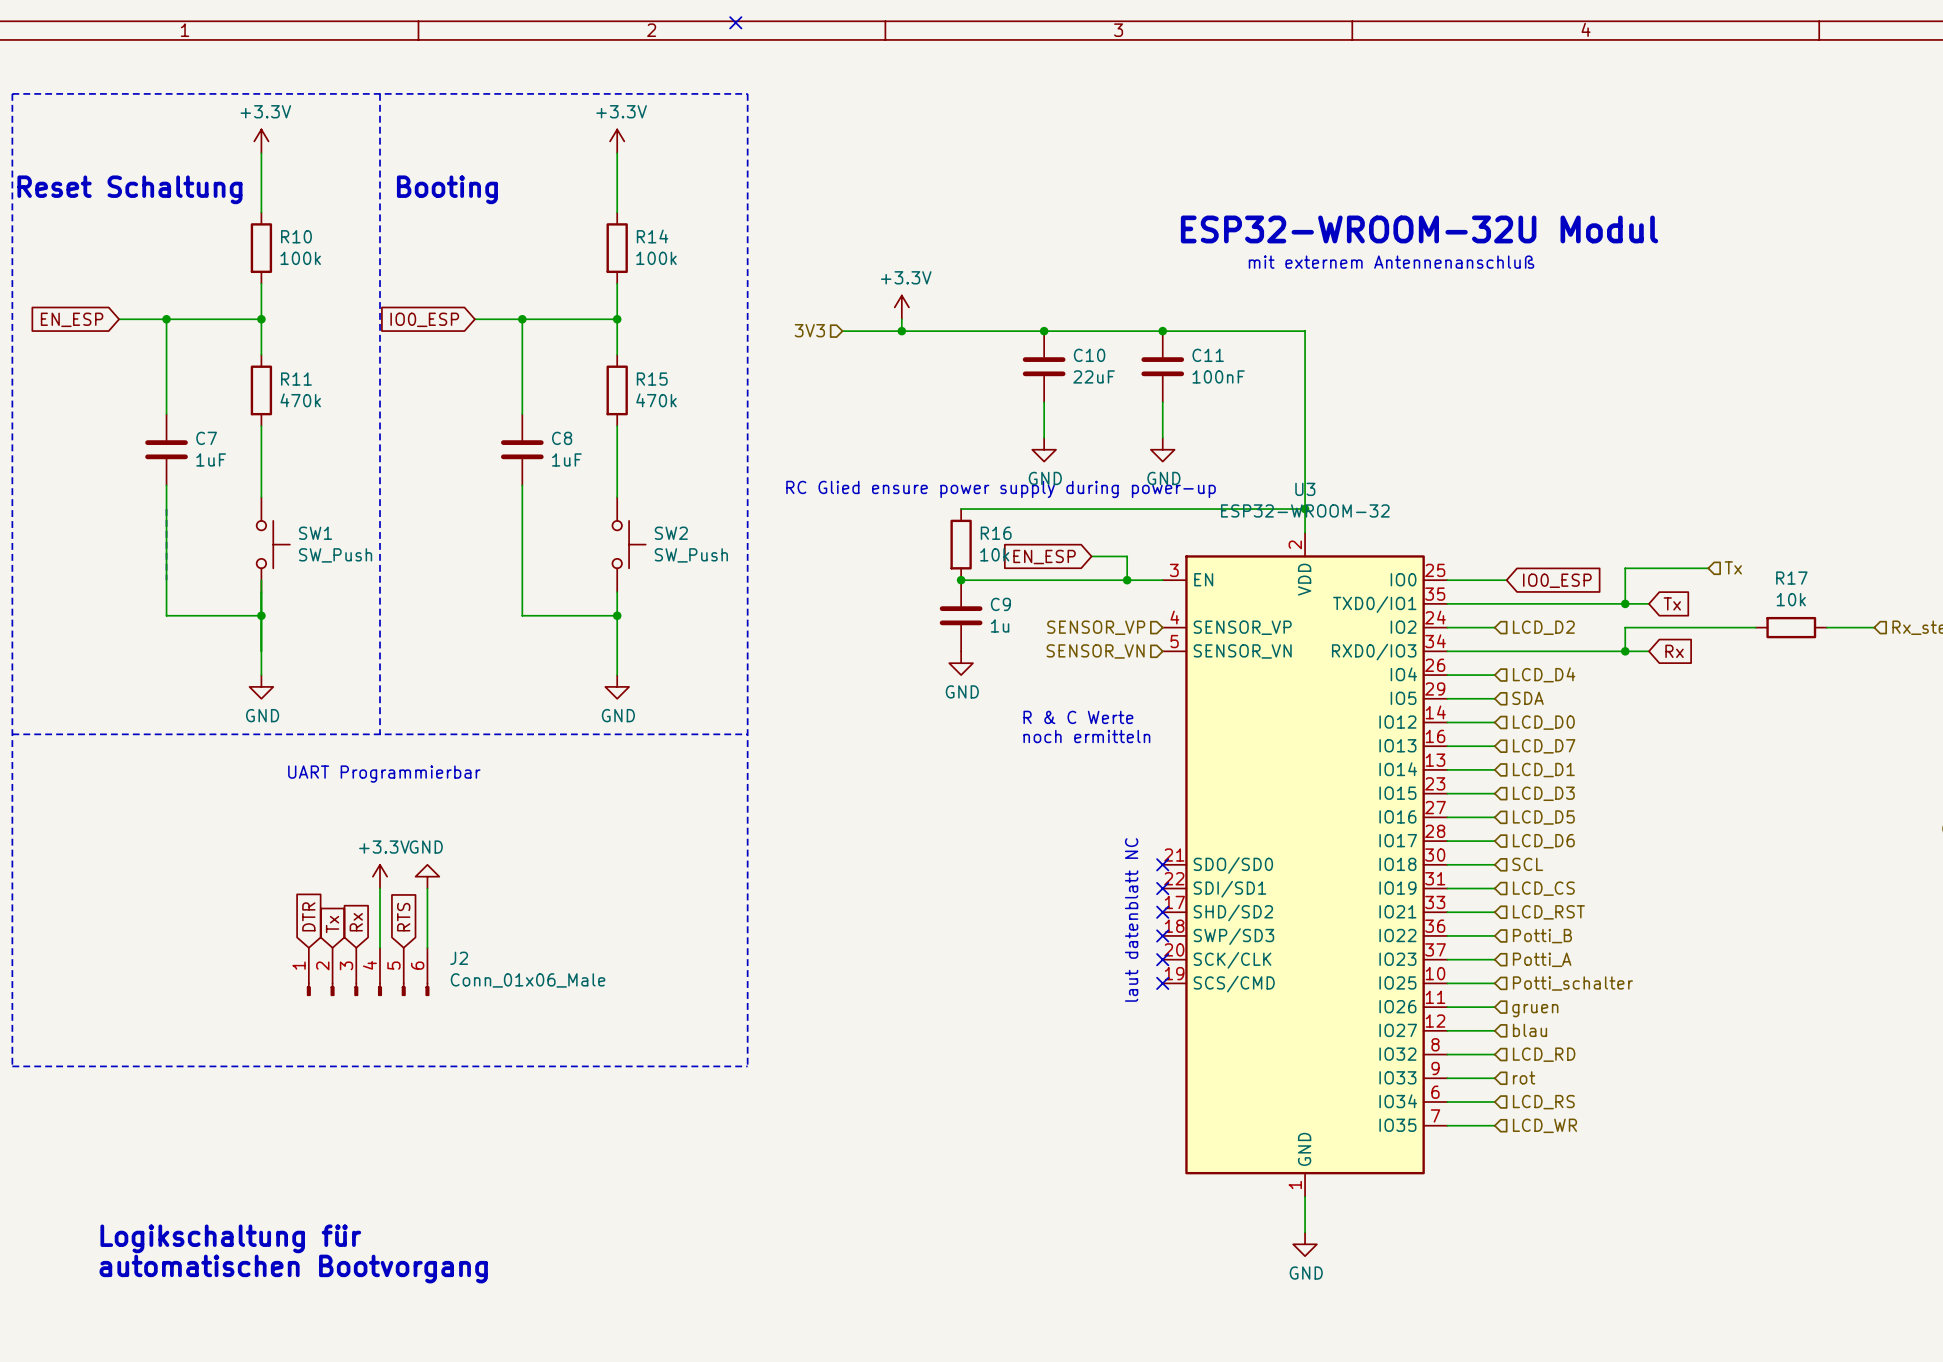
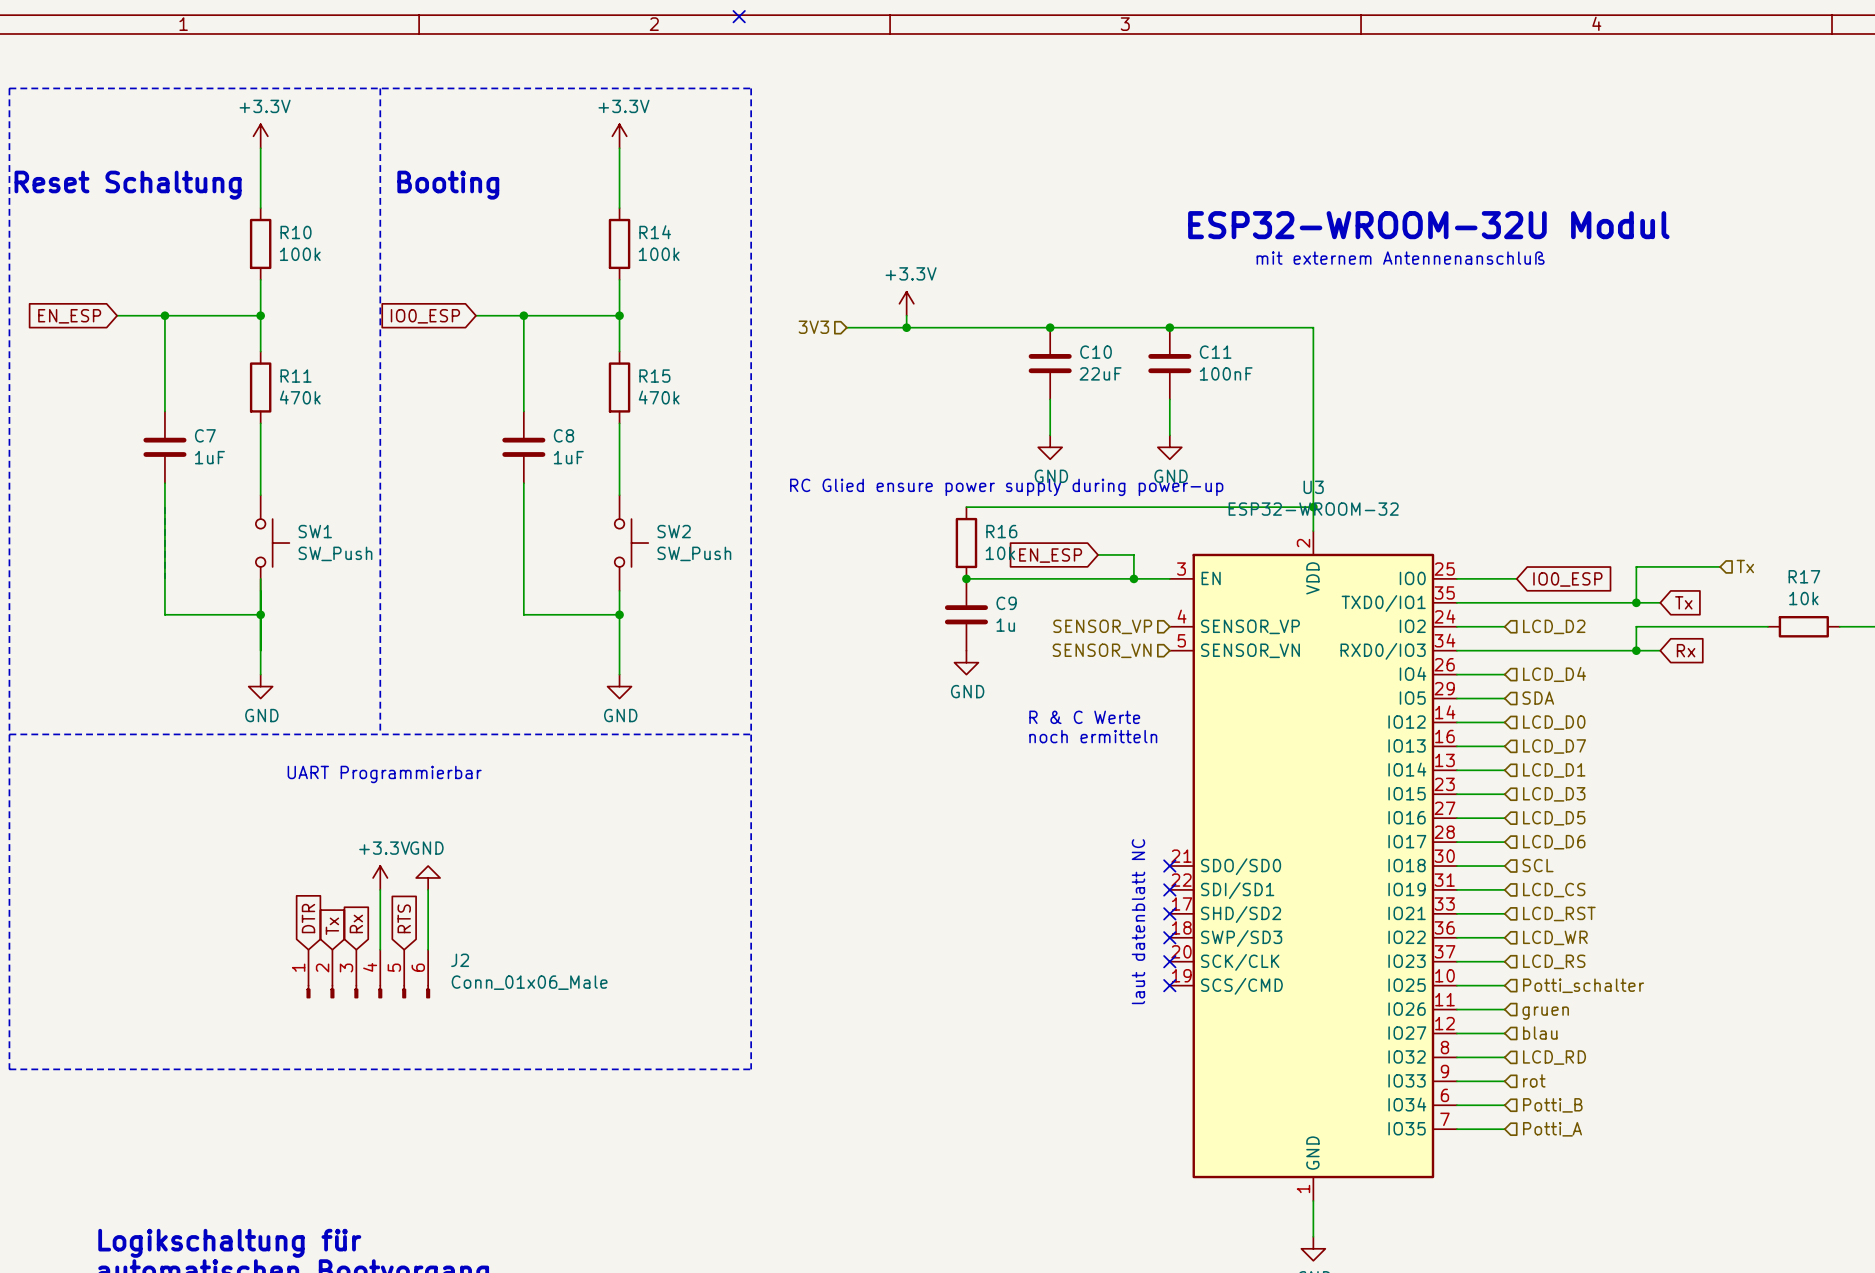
hierarchical label: Potti_B (1542, 936) -> LCD_WR (1555, 937)
hierarchical label: Potti_A (1542, 959) -> LCD_RS (1554, 961)
hierarchical label: LCD_RS (1543, 1102) -> Potti_B (1552, 1105)
hierarchical label: LCD_WR (1544, 1125) -> Potti_A (1552, 1129)

